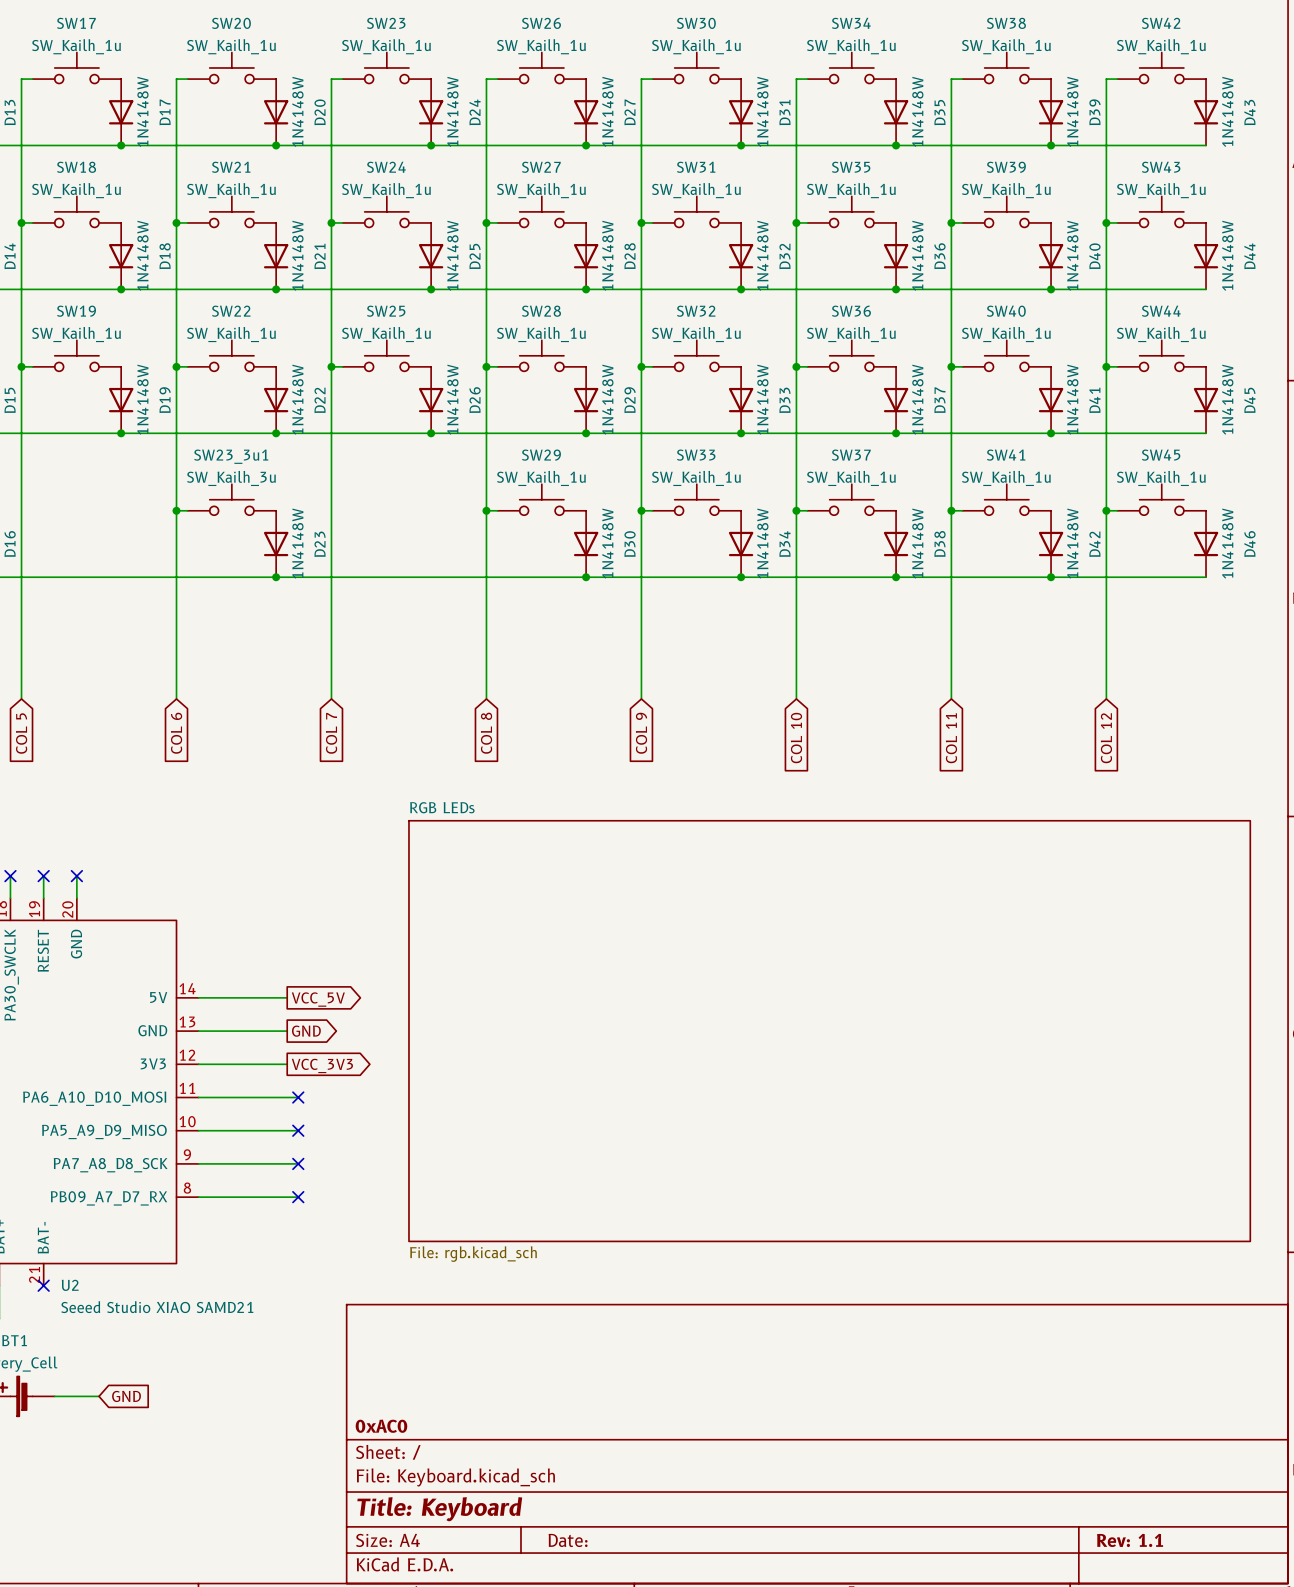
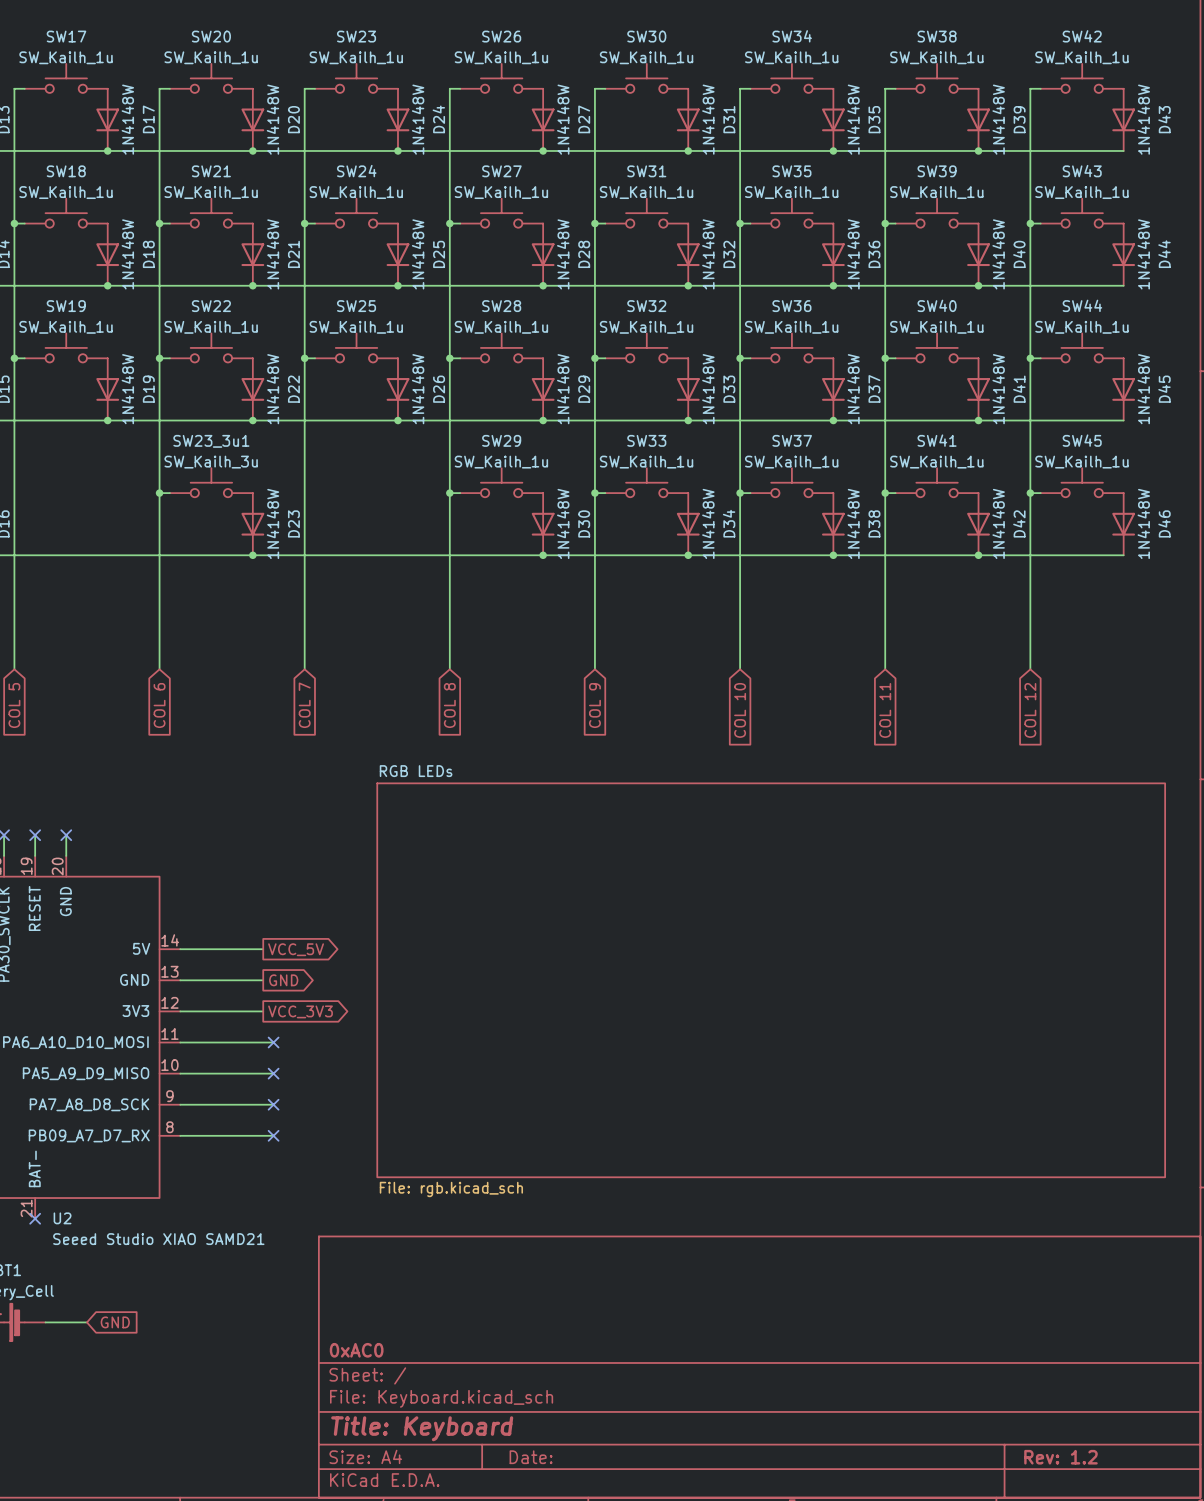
title block: Rev: 1.1 (1130, 1540) -> Rev: 1.2 (1060, 1457)

